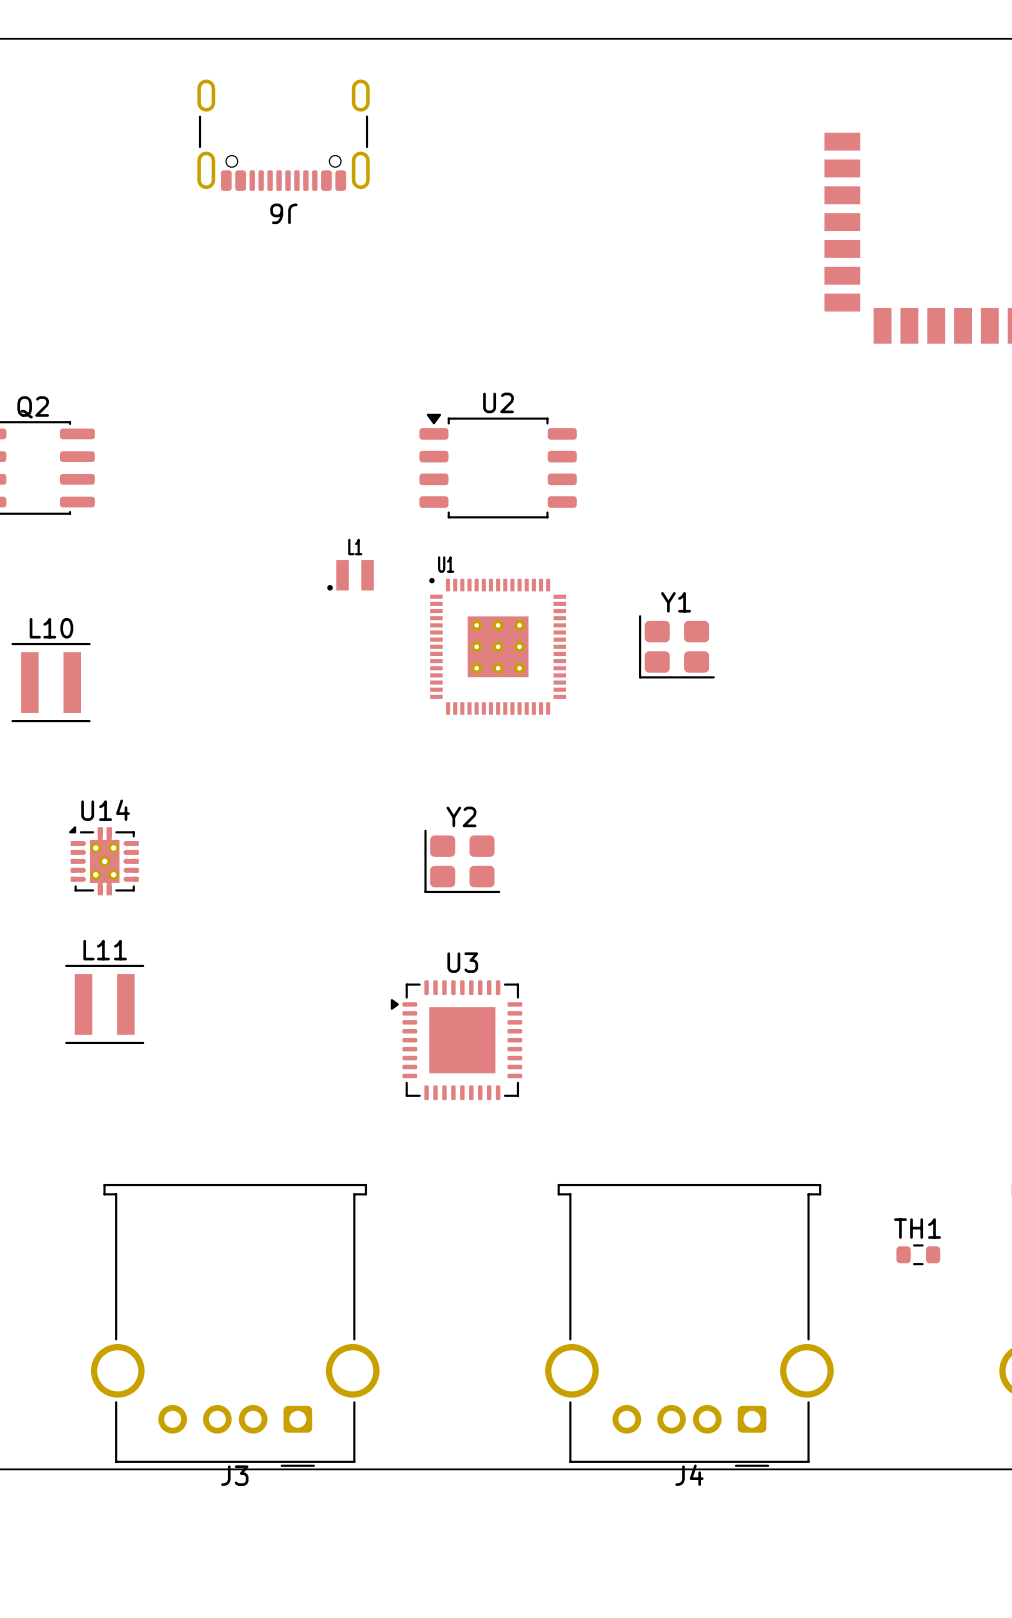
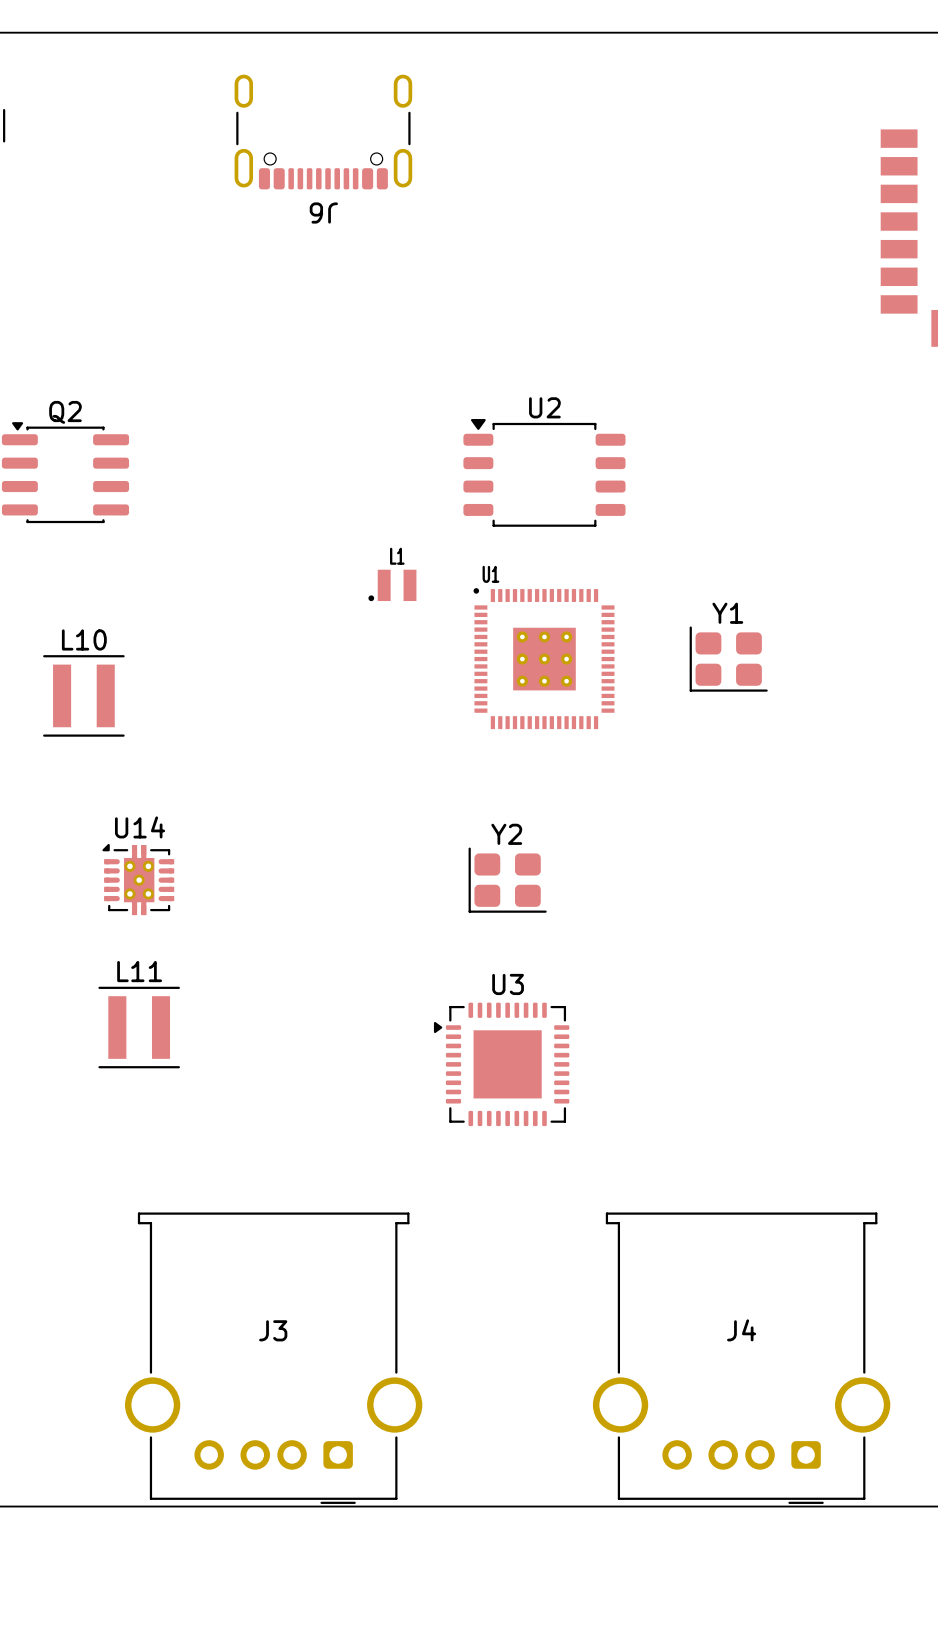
J3 name position: J3 (234, 1475) -> J3 (273, 1330)
J4 name position: J4 (689, 1475) -> J4 (741, 1330)

